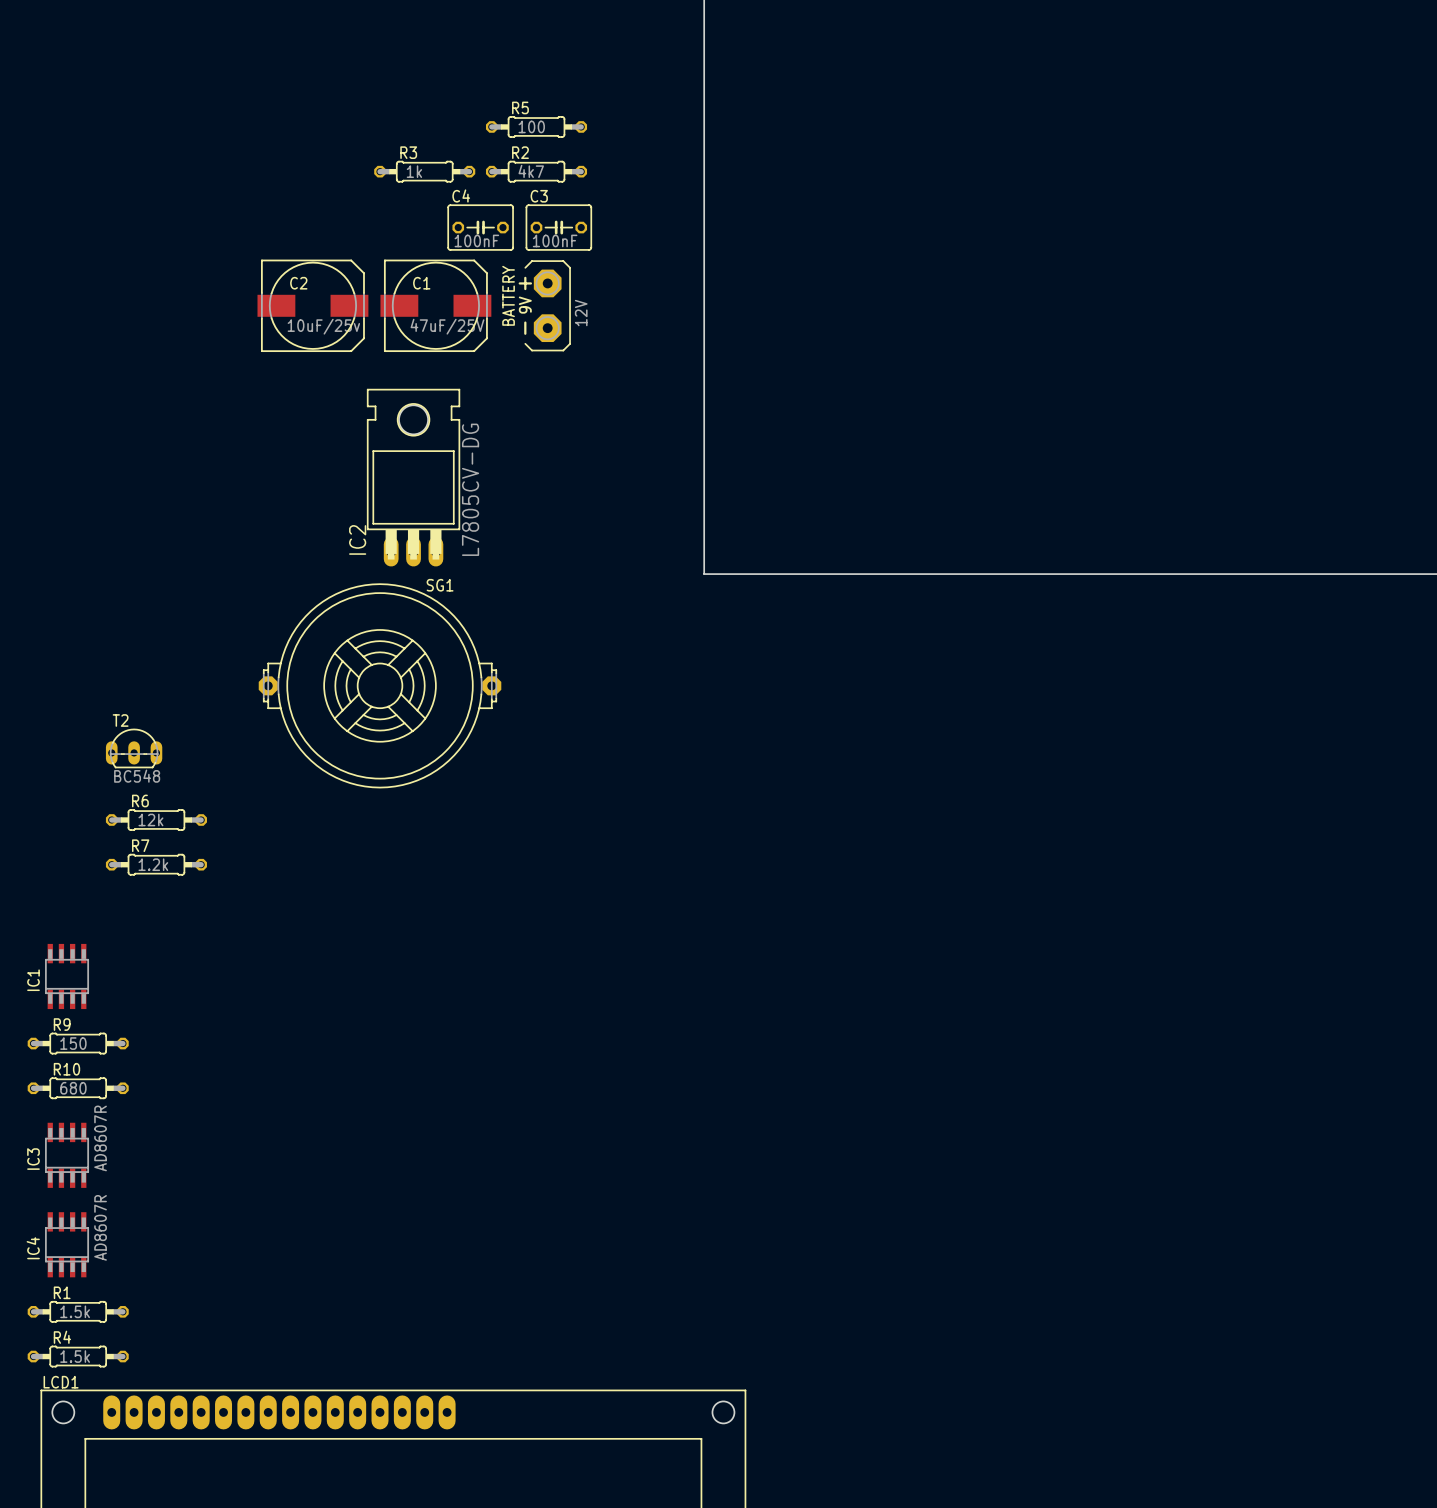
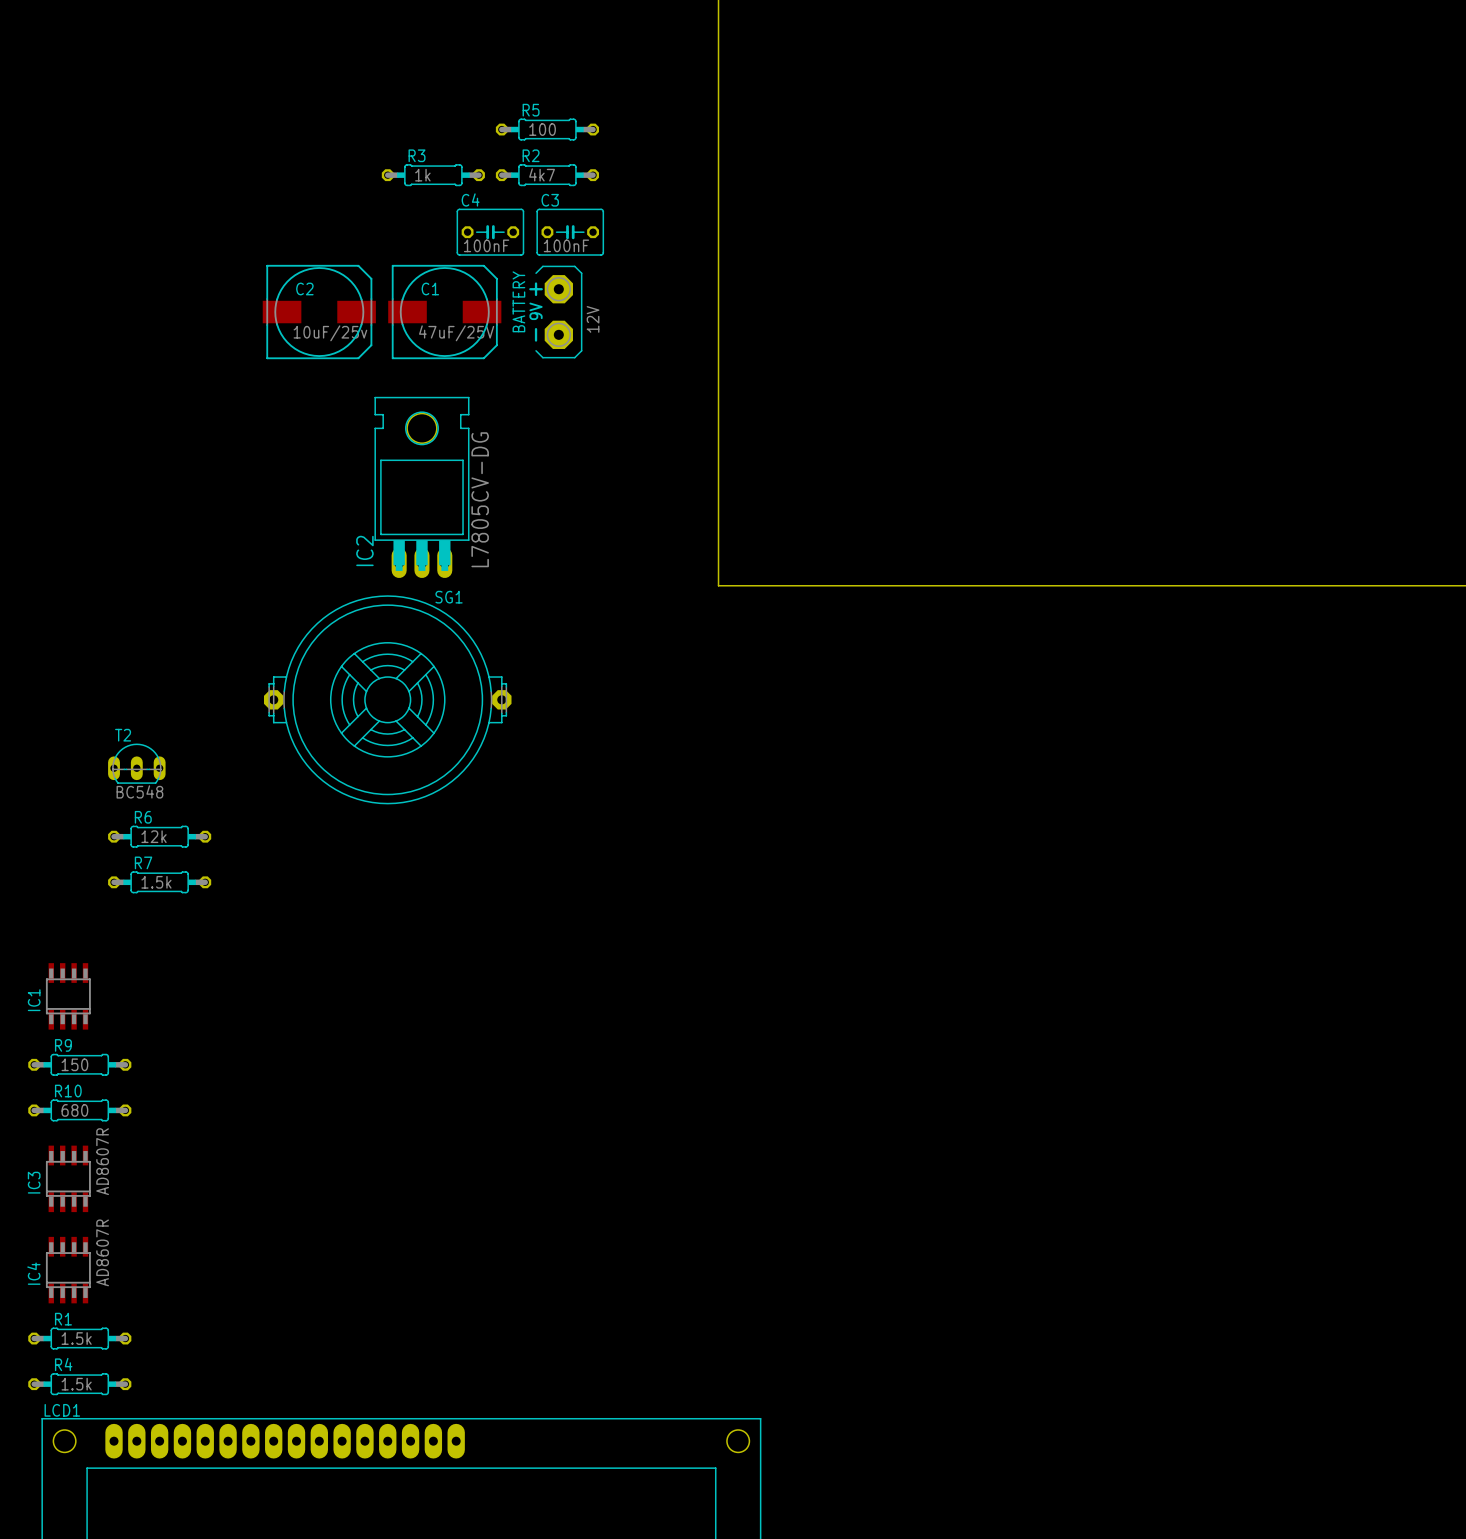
R7 value: 1.2k (153, 864) -> 1.5k (156, 882)

